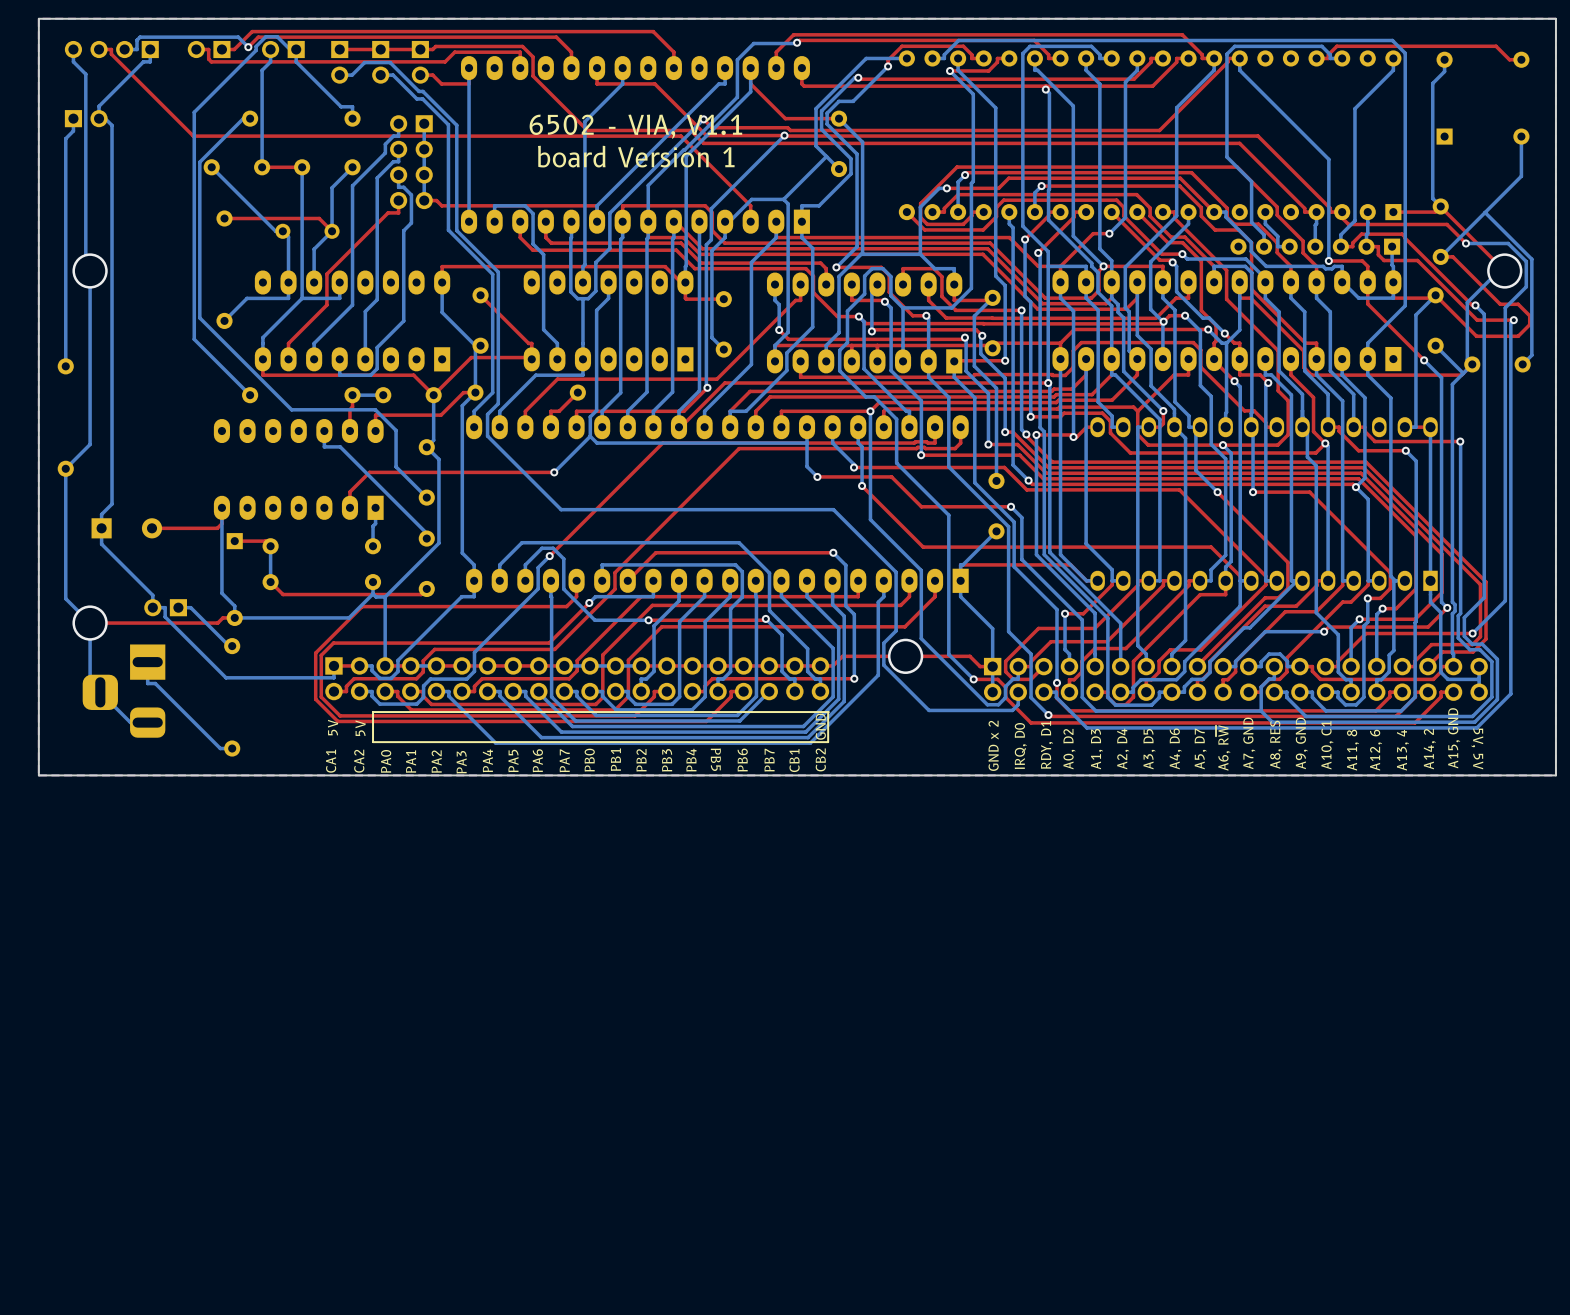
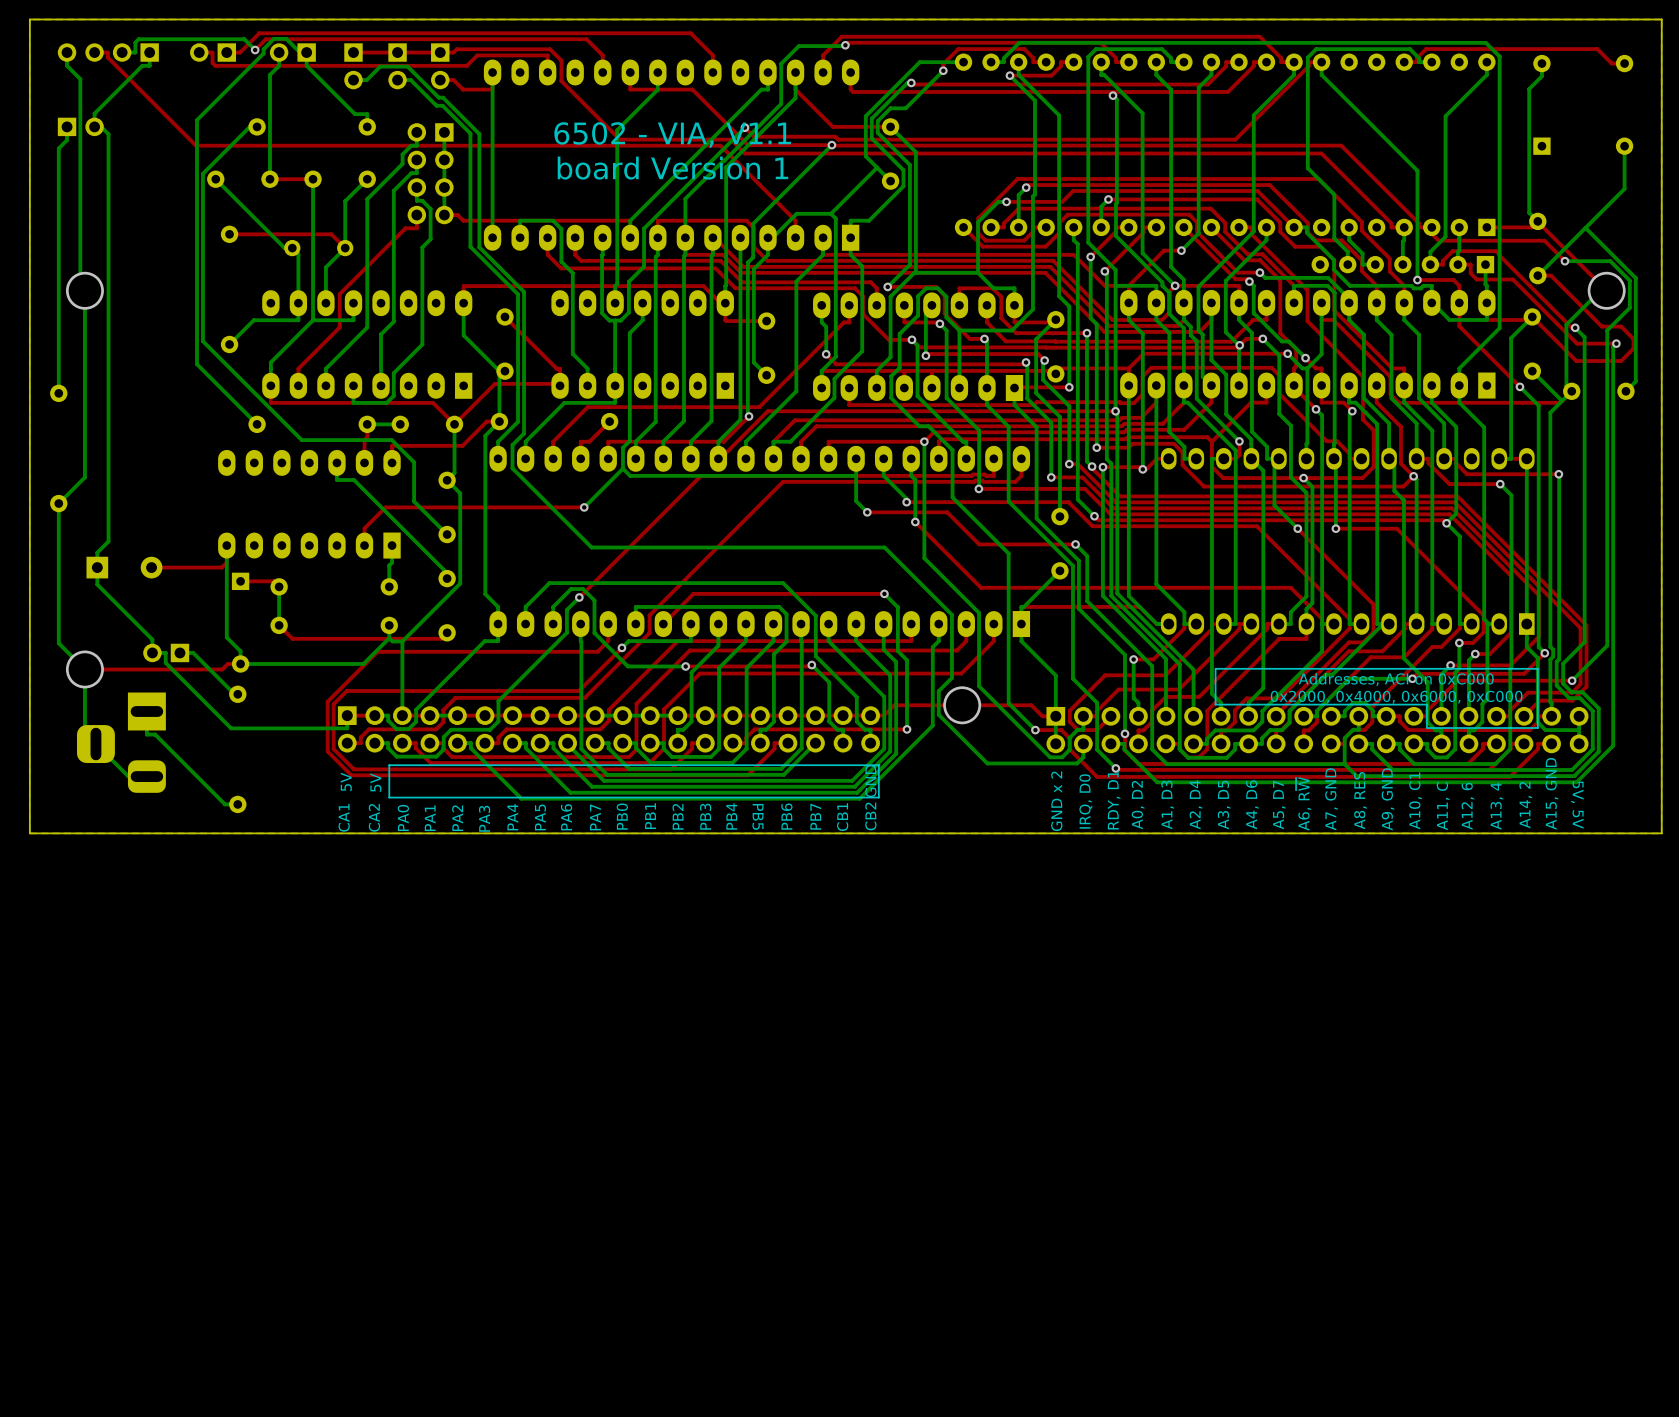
text: none -> Addresses, ACI on 0xC000 (1396, 679)
text: none -> 0x2000, 0x4000, 0x6000, 0xC000 (1396, 697)
line: none -> (1427, 728) (1537, 728) (1537, 668) (1215, 668) (1215, 704) (1426, 704) (1426, 728)
text: A11, 8 (1353, 750) -> A11, C (1443, 806)

